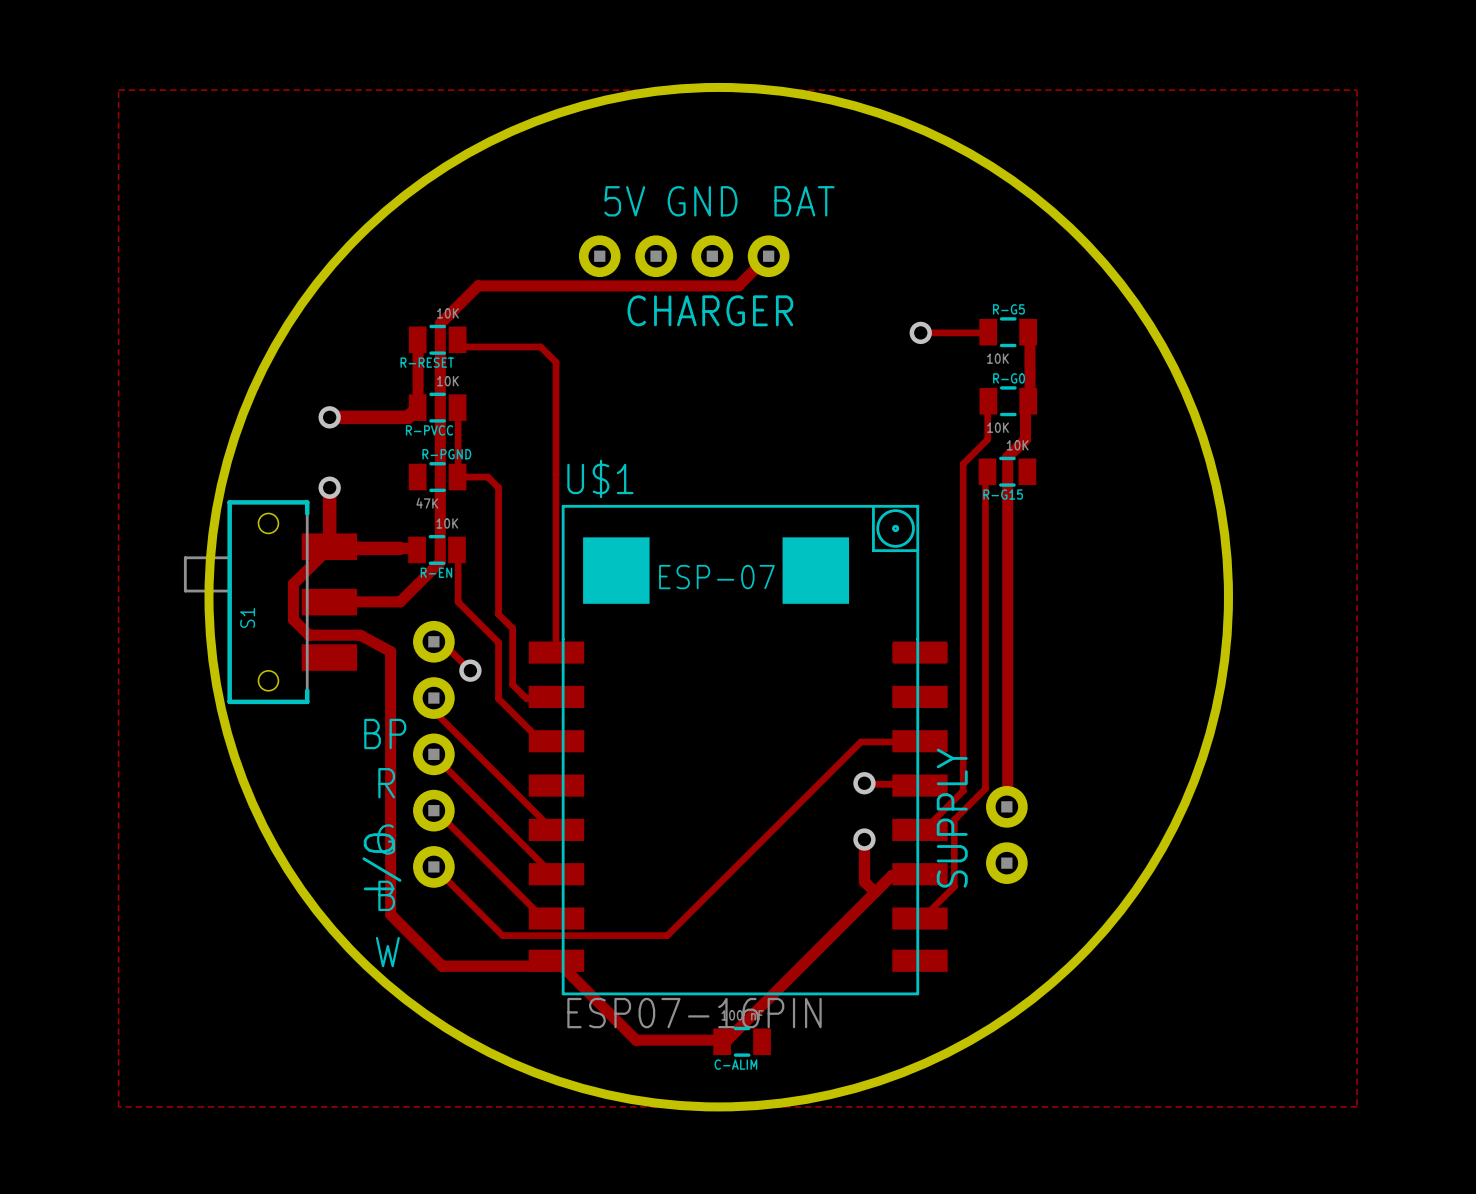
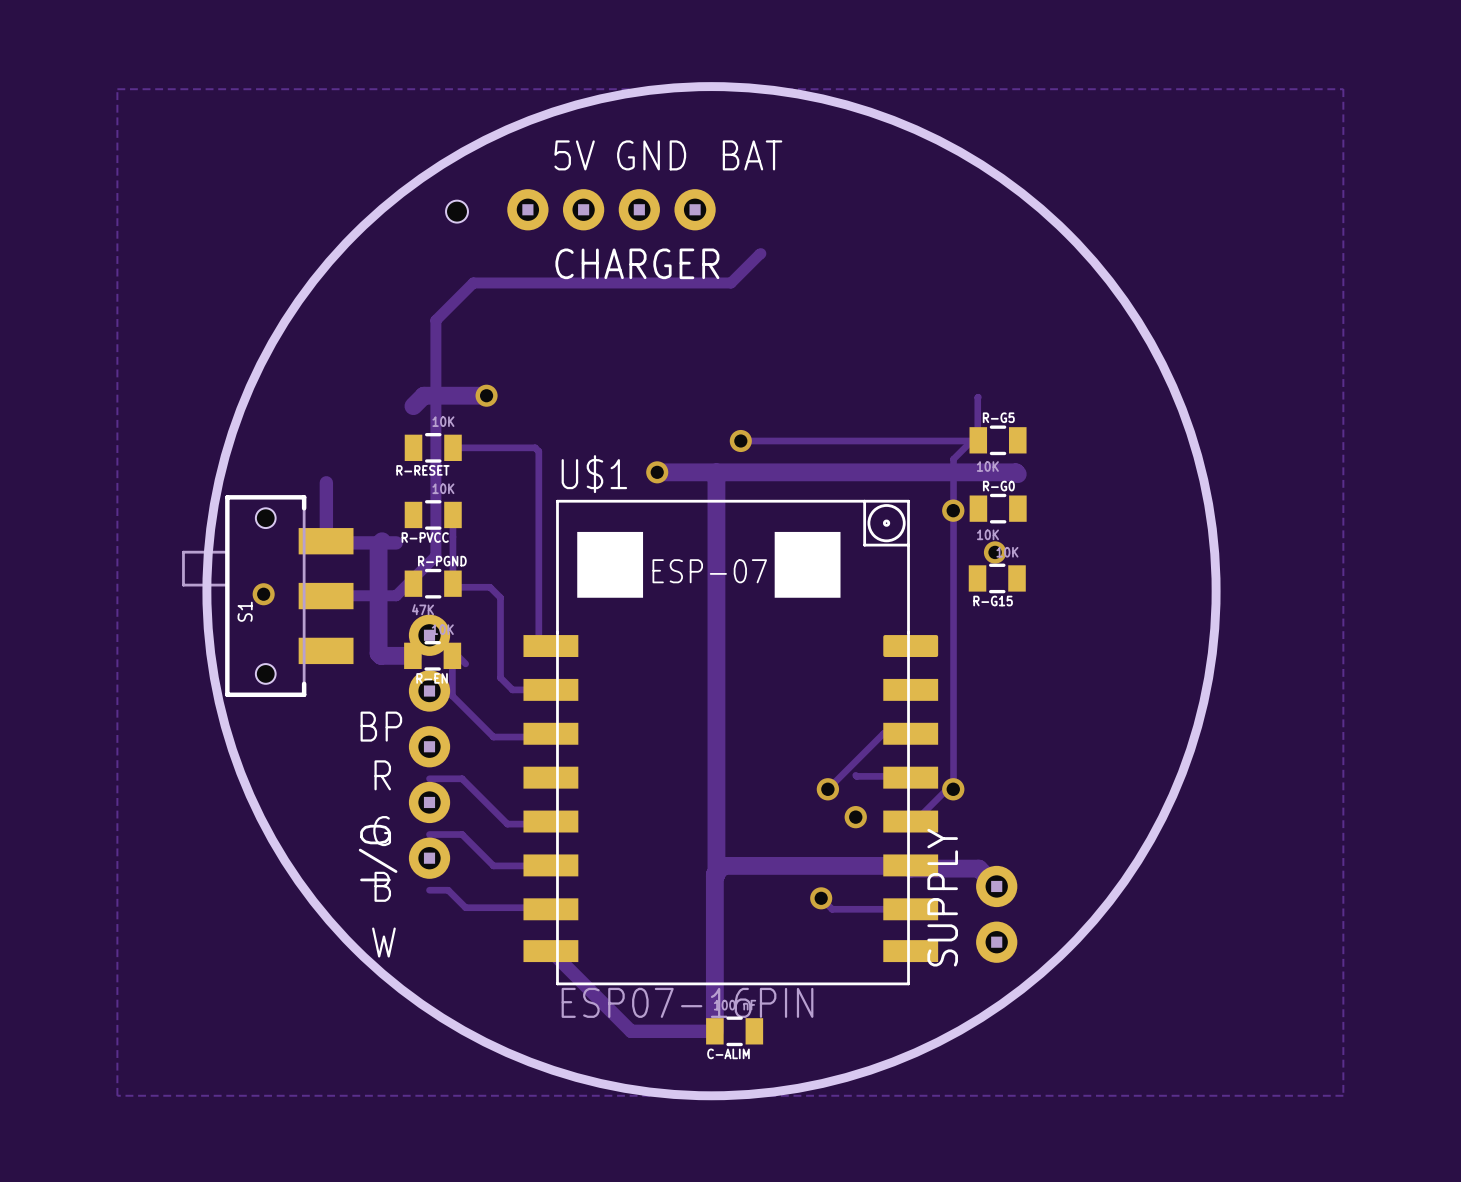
text position: 5V (624, 201) -> 5V (574, 155)
text position: GND (702, 201) -> GND (651, 155)
text position: BAT (804, 201) -> BAT (752, 155)
hole: none -> (457, 211)
CHARGER position: (684, 256) -> (611, 209)
track: (920, 332) (991, 332) -> none
via: (920, 332) -> none
R-G5 position: (1008, 332) -> (998, 440)
track: (1028, 332) (1029, 332) (1029, 399) (1025, 406) (1025, 439) (1007, 457) (1006, 806) -> none
track: (417, 339) (418, 406) (407, 417) (329, 417) -> none
R-RESET position: (437, 339) -> (433, 447)
track: (458, 341) (457, 339) (464, 346) (540, 346) (556, 362) (556, 652) -> (453, 447) (535, 447) (538, 451) (538, 646) (550, 646)
track: none -> (486, 395) (423, 395) (413, 406)
via: none -> (486, 395)
R-G0 position: (1008, 401) -> (998, 508)
R-PVCC position: (437, 407) -> (433, 514)
track: (457, 407) (457, 477) (487, 477) (498, 487) (498, 614) (512, 628) (512, 684) (526, 698) (554, 698) (556, 696) (551, 695) -> none
via: (329, 417) -> none
track: none -> (978, 440) (740, 441)
via: none -> (740, 441)
track: (987, 471) (985, 472) (985, 788) (954, 819) (954, 886) (920, 920) (919, 918) -> (821, 898) (832, 909) (910, 909)
R-G15 position: (1007, 471) -> (997, 578)
R-PGND position: (437, 477) -> (433, 583)
track: none -> (657, 472) (1015, 472) (1017, 474)
via: none -> (657, 472)
track: none -> (716, 472) (716, 874) (714, 876)
via: (329, 487) -> none
via: none -> (953, 510)
track: none -> (452, 514) (452, 583) (456, 587) (490, 587) (500, 597) (500, 677) (512, 689) (550, 689)
track: none -> (382, 541) (378, 544) (378, 653) (380, 655) (412, 655)
track: (417, 549) (331, 548) (329, 546) (293, 584) (293, 619) (309, 635) (360, 635) (390, 651) (390, 914) (442, 966) (551, 966) (556, 960) (636, 1040) (720, 1040) (722, 1041) (727, 1040) (892, 875) (919, 874) -> none
R-EN position: (437, 549) -> (432, 655)
track: (456, 549) (458, 602) (498, 642) (498, 698) (540, 741) (556, 741) -> (452, 655) (452, 695) (493, 737) (547, 737) (550, 733)
via: none -> (995, 552)
via: none -> (263, 594)
via: (470, 670) -> none
track: (433, 698) (435, 699) (435, 713) (551, 828) (556, 829) -> (429, 778) (462, 778) (507, 824) (548, 824) (550, 821)
track: (919, 741) (860, 742) (667, 935) (502, 935) (433, 866) -> (910, 733) (883, 733) (827, 789)
track: (433, 754) (551, 873) (556, 874) -> (429, 834) (462, 834) (493, 865) (550, 865)
via: (864, 783) -> none
via: none -> (827, 789)
via: none -> (953, 789)
track: (433, 810) (542, 917) (556, 918) -> (429, 890) (448, 890) (465, 907) (549, 907) (550, 909)
SUPPLY position: (1006, 834) -> (996, 914)
track: (864, 839) (864, 881) (875, 892) -> none
via position: (864, 839) -> (855, 817)
track: none -> (996, 886) (978, 868) (910, 868) (910, 865) (723, 865) (714, 874) (714, 1031) (631, 1031) (550, 951)
via: none -> (821, 898)

